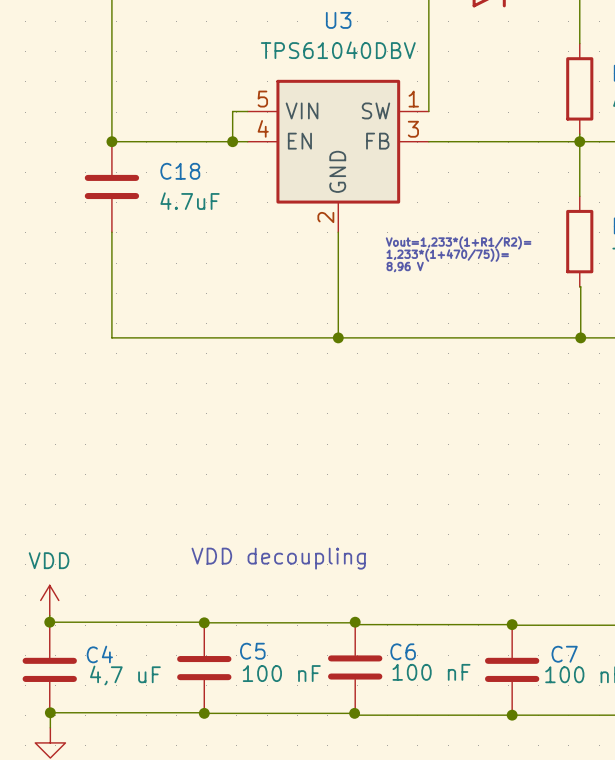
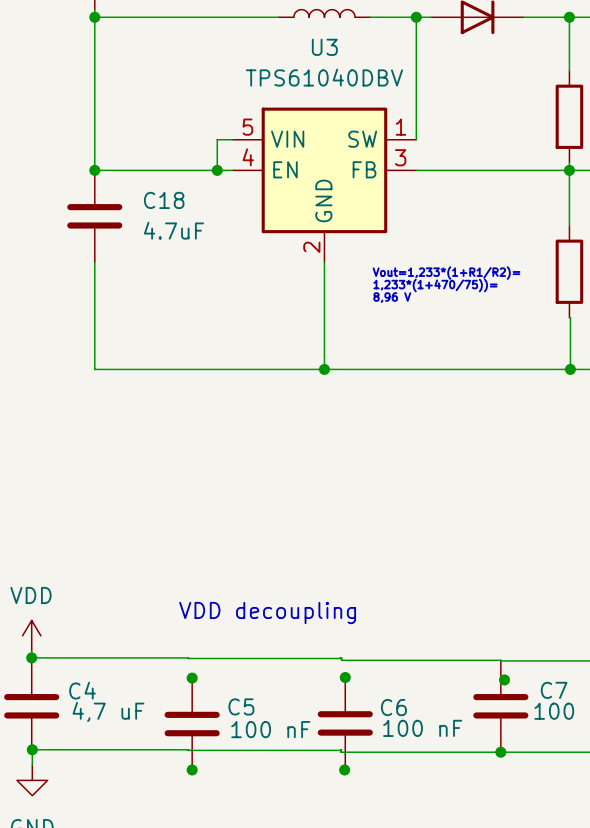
text position: VDD decoupling (278, 558) -> VDD decoupling (267, 612)
junction position: (204, 622) -> (192, 678)
junction position: (355, 622) -> (345, 677)
junction position: (512, 624) -> (504, 679)
C6 position: (355, 667) -> (345, 723)
C5 position: (204, 668) -> (192, 724)
junction position: (204, 713) -> (192, 769)
junction position: (354, 713) -> (344, 769)

